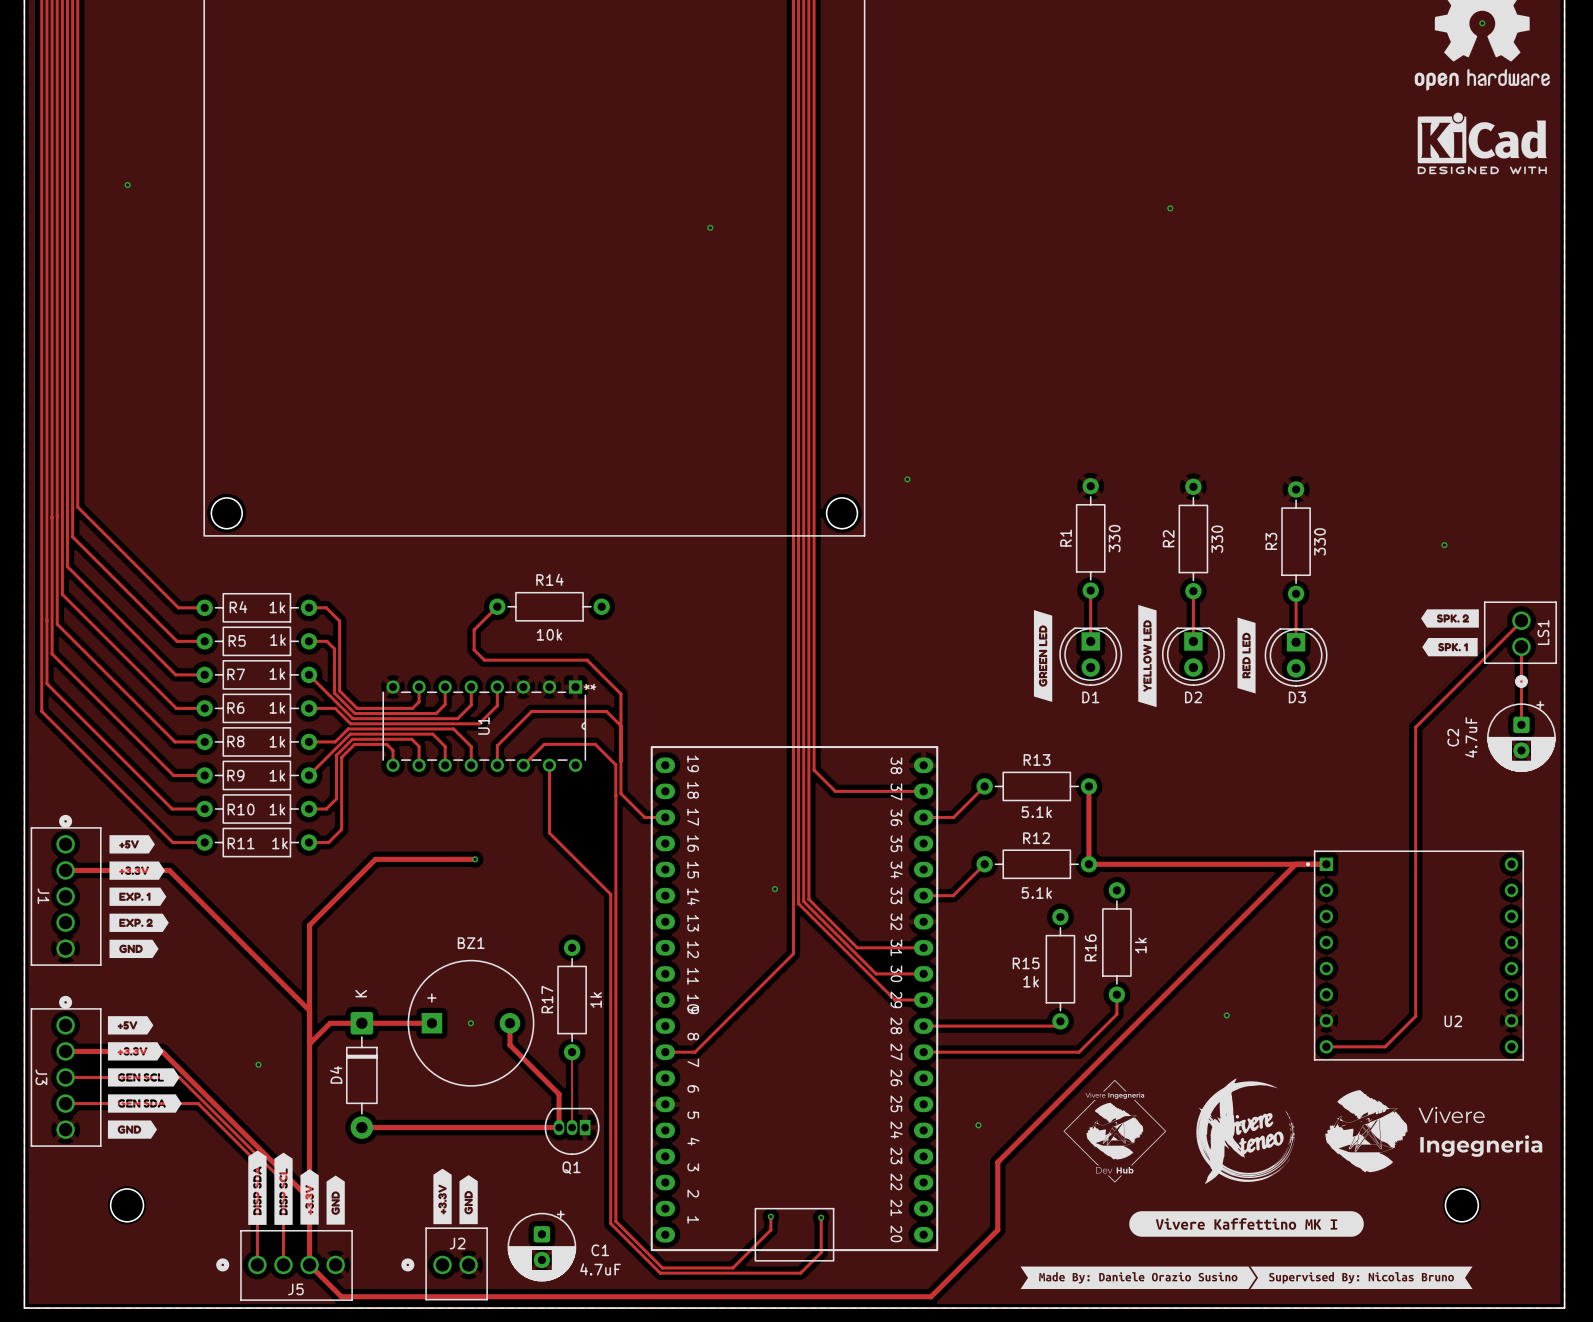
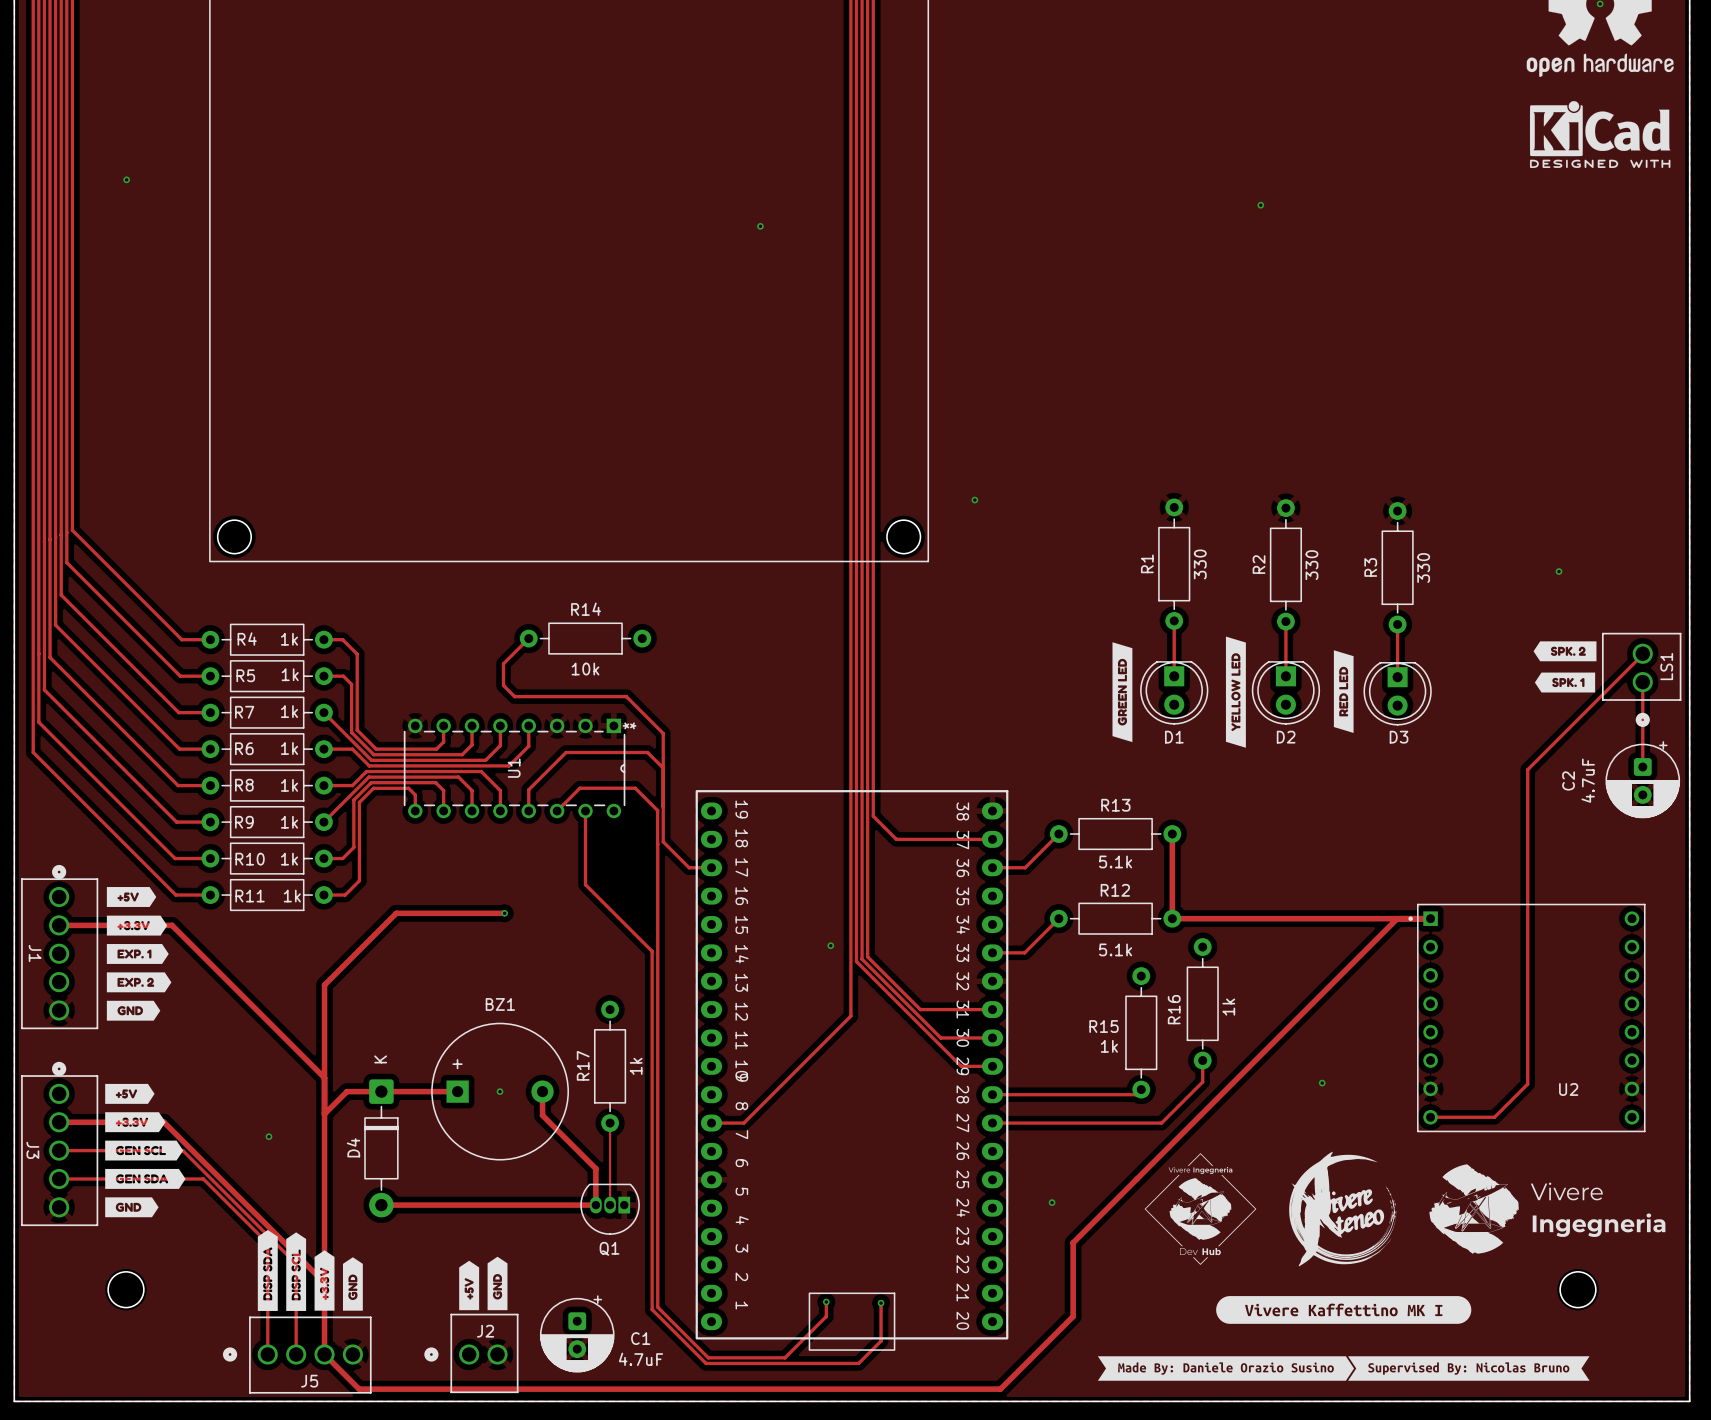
drawing shape: [433, 1168, 452, 1225] -> [459, 1260, 480, 1311]

